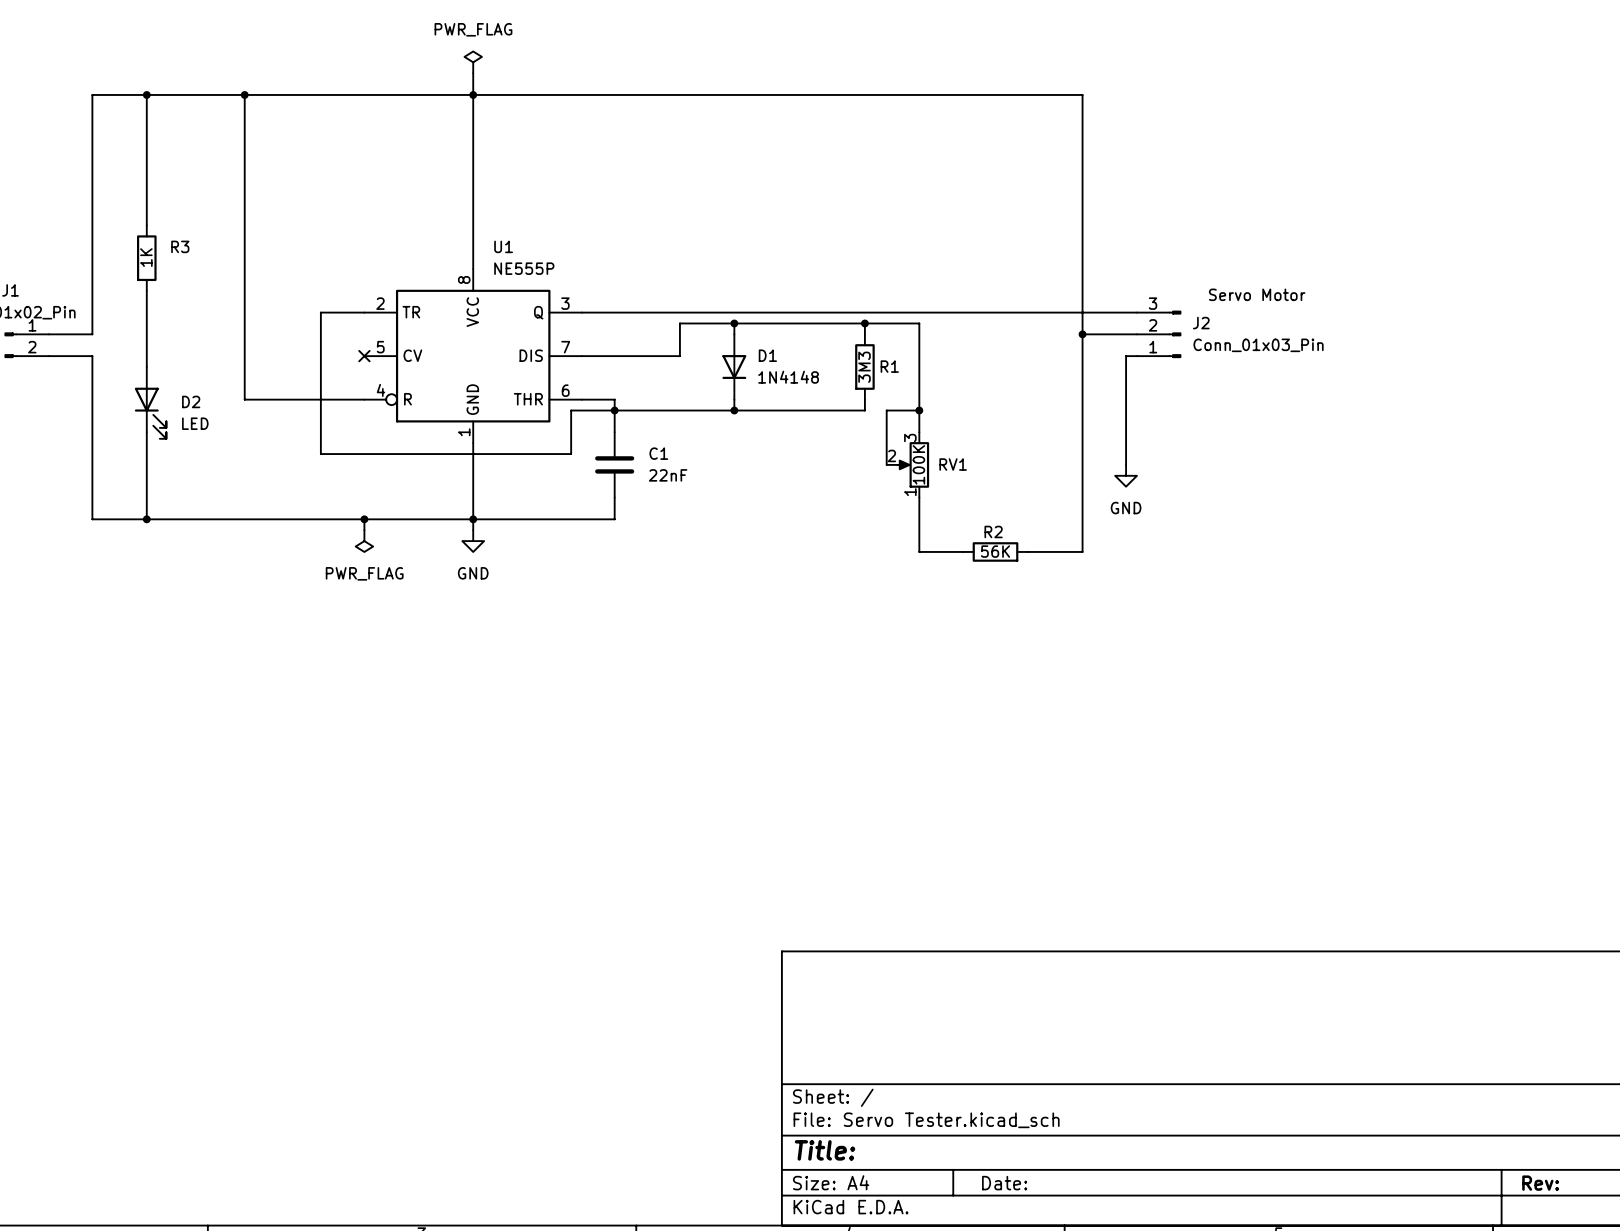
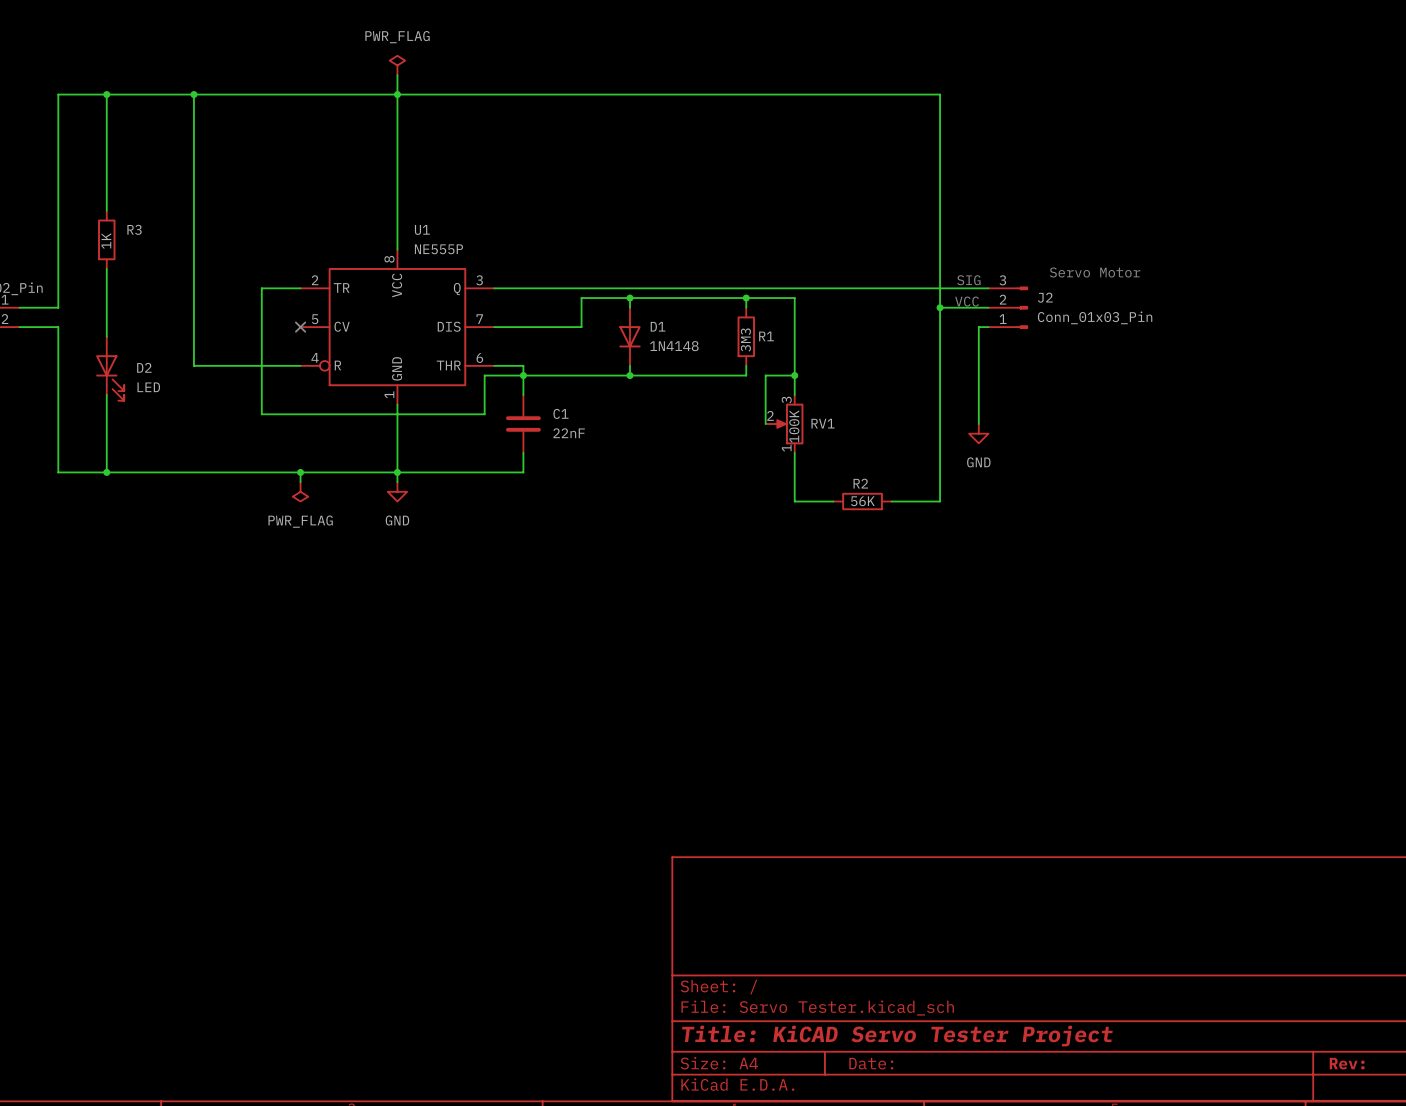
text: none -> SIG (968, 280)
text: none -> VCC (967, 301)
title block: Title: (825, 1150) -> Title: KiCAD Servo Tester Project (897, 1036)

